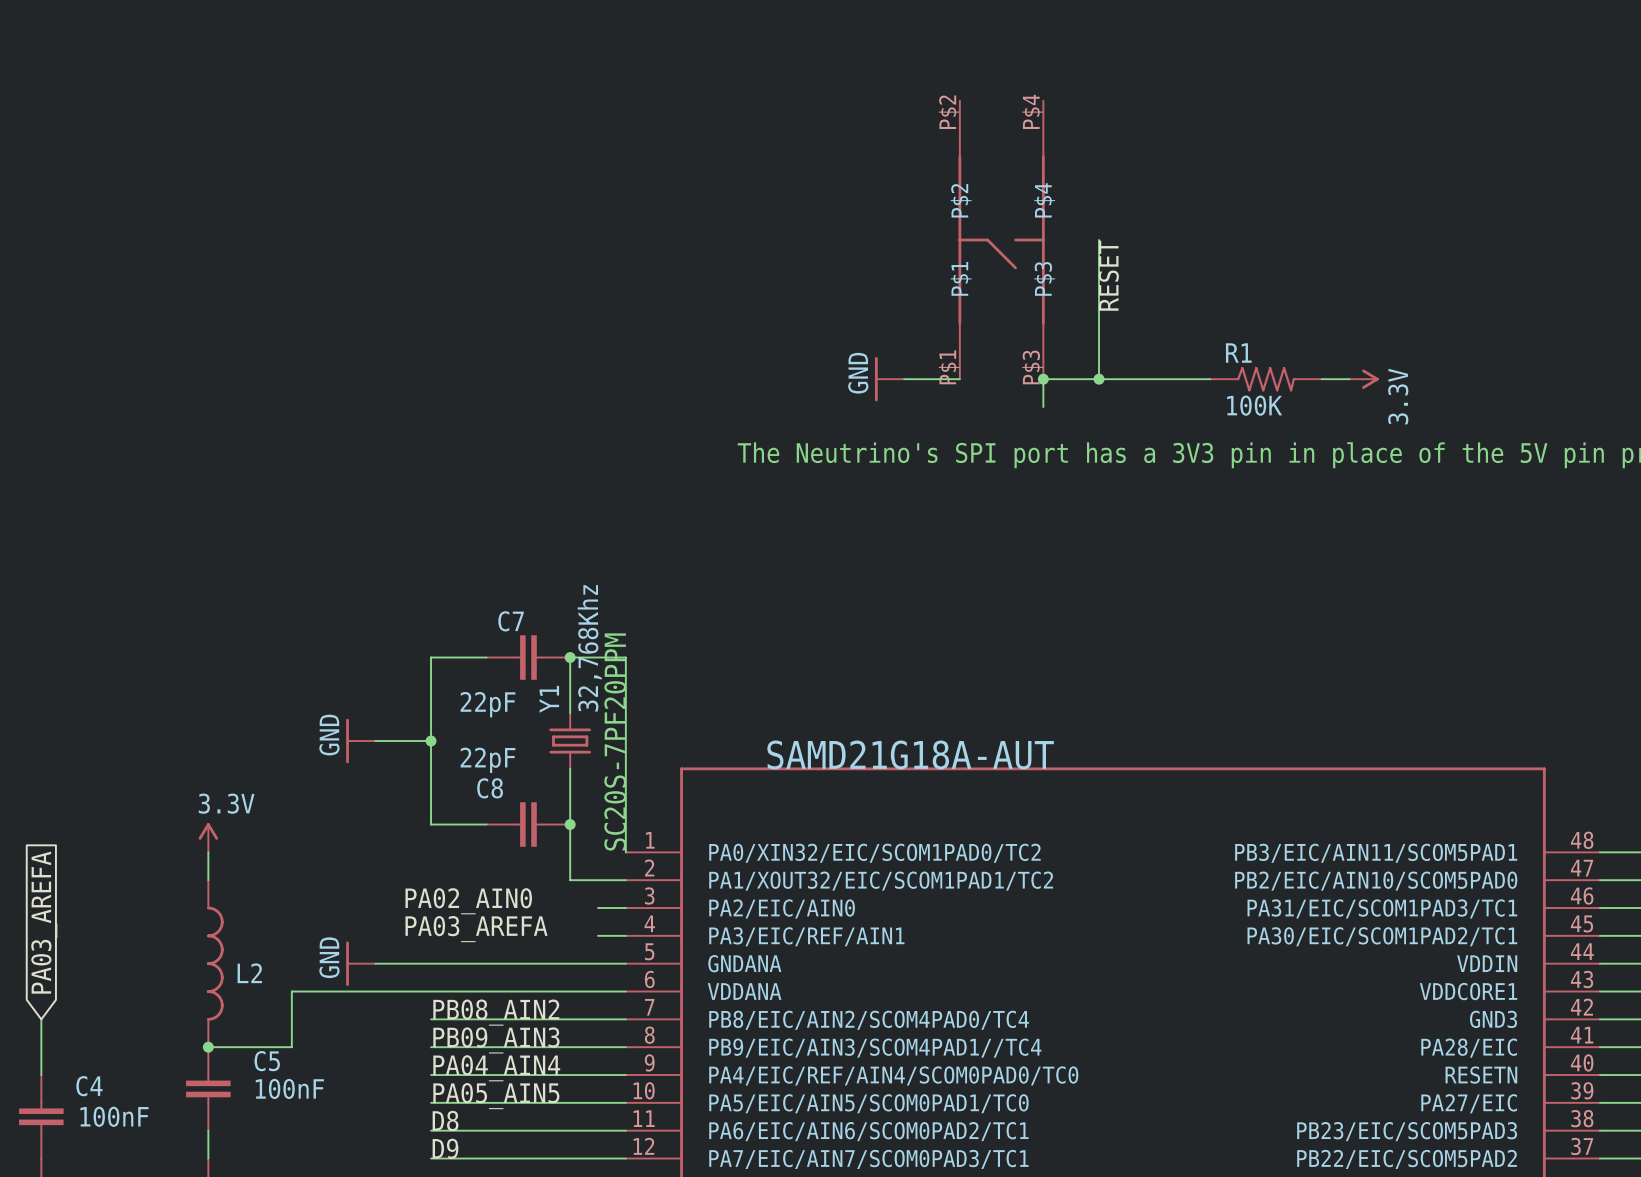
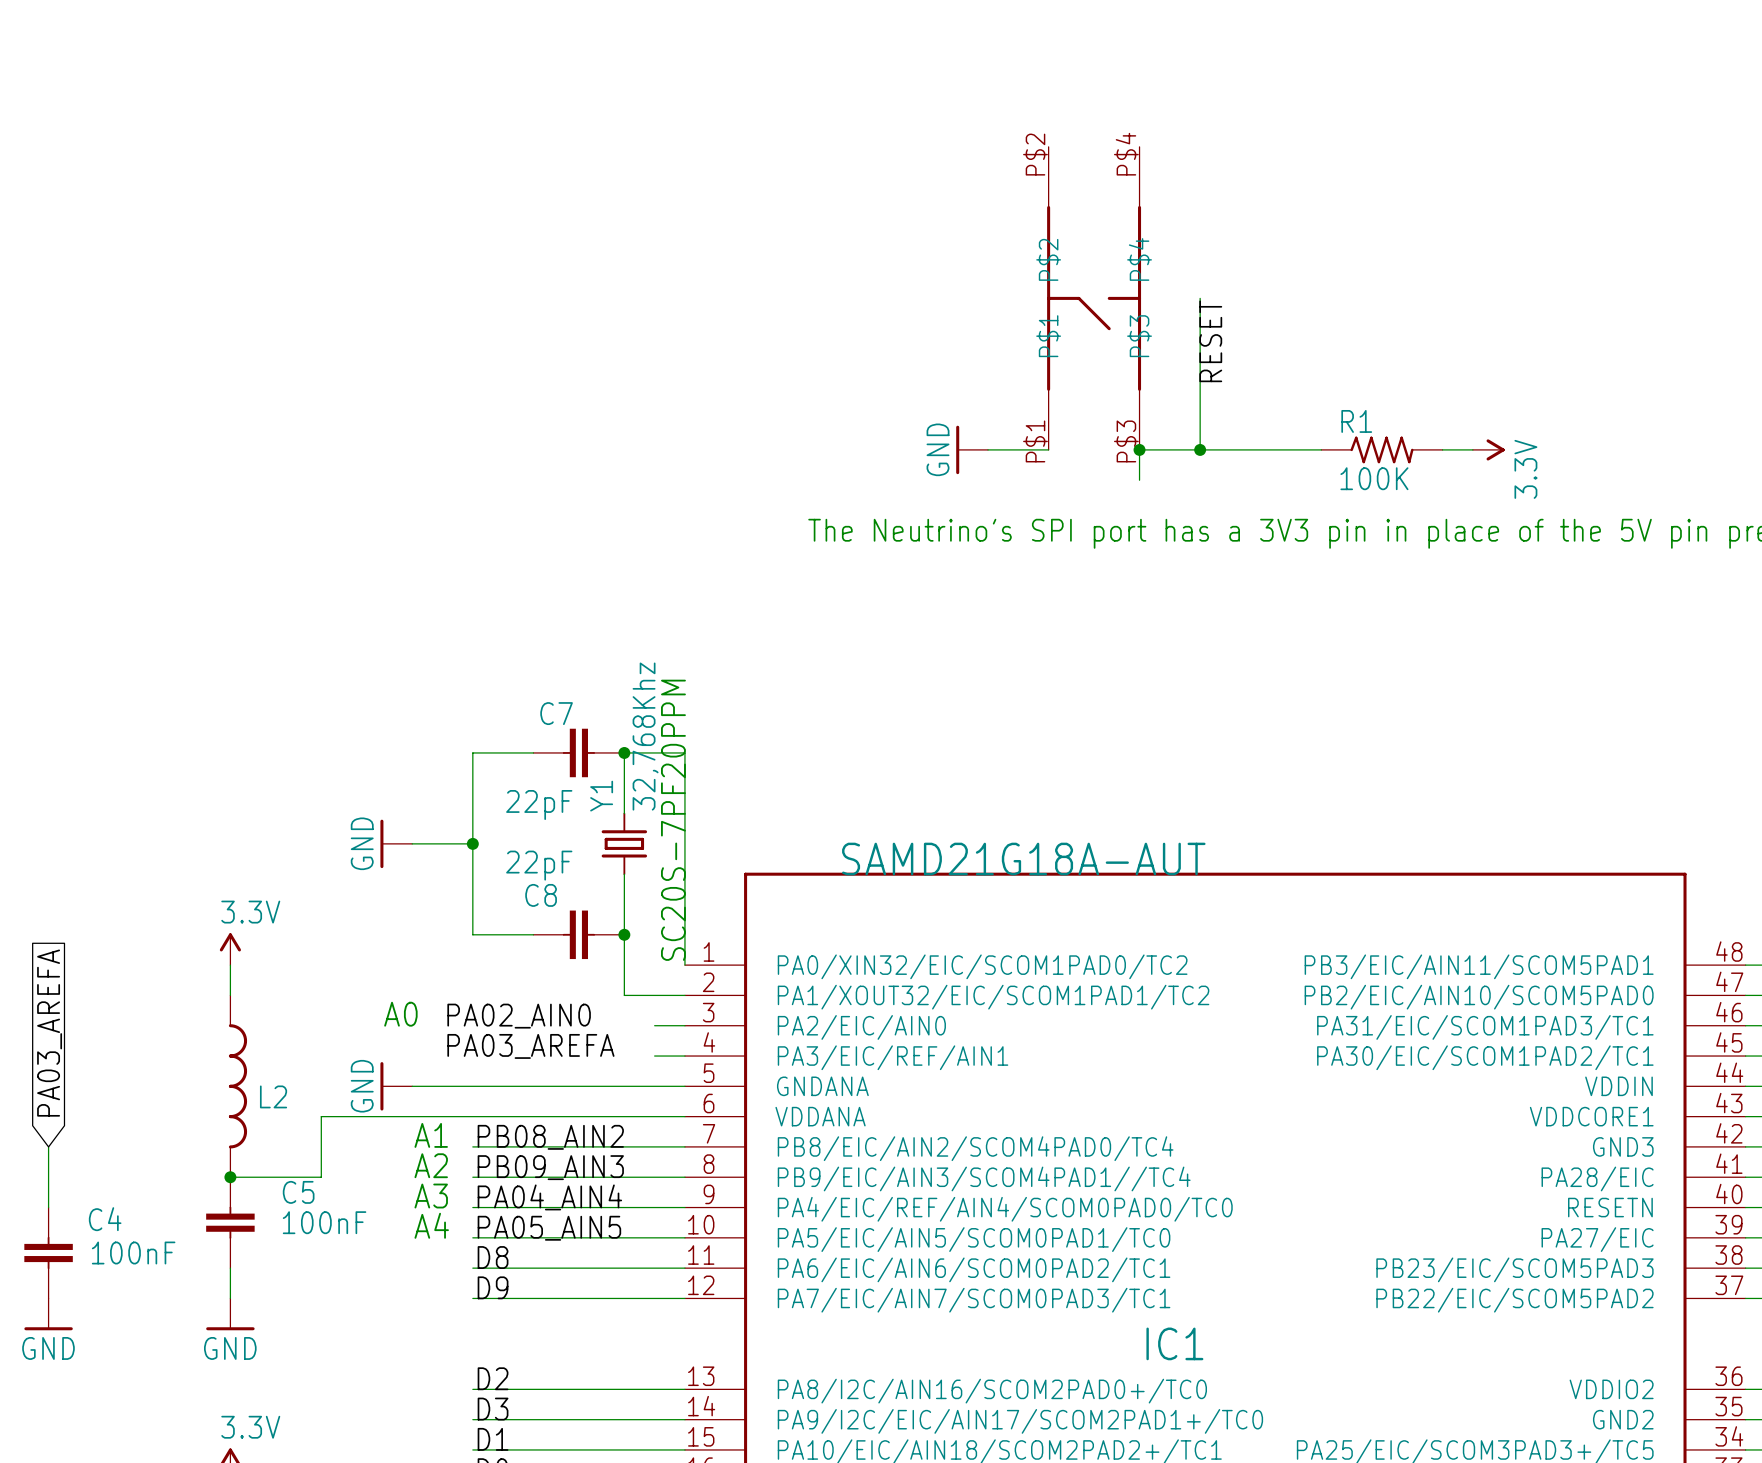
text: none -> A0 (400, 1014)
text: none -> A1 (431, 1135)
text: none -> A2 (431, 1165)
text: none -> A3 (431, 1196)
text: none -> A4 (431, 1225)

